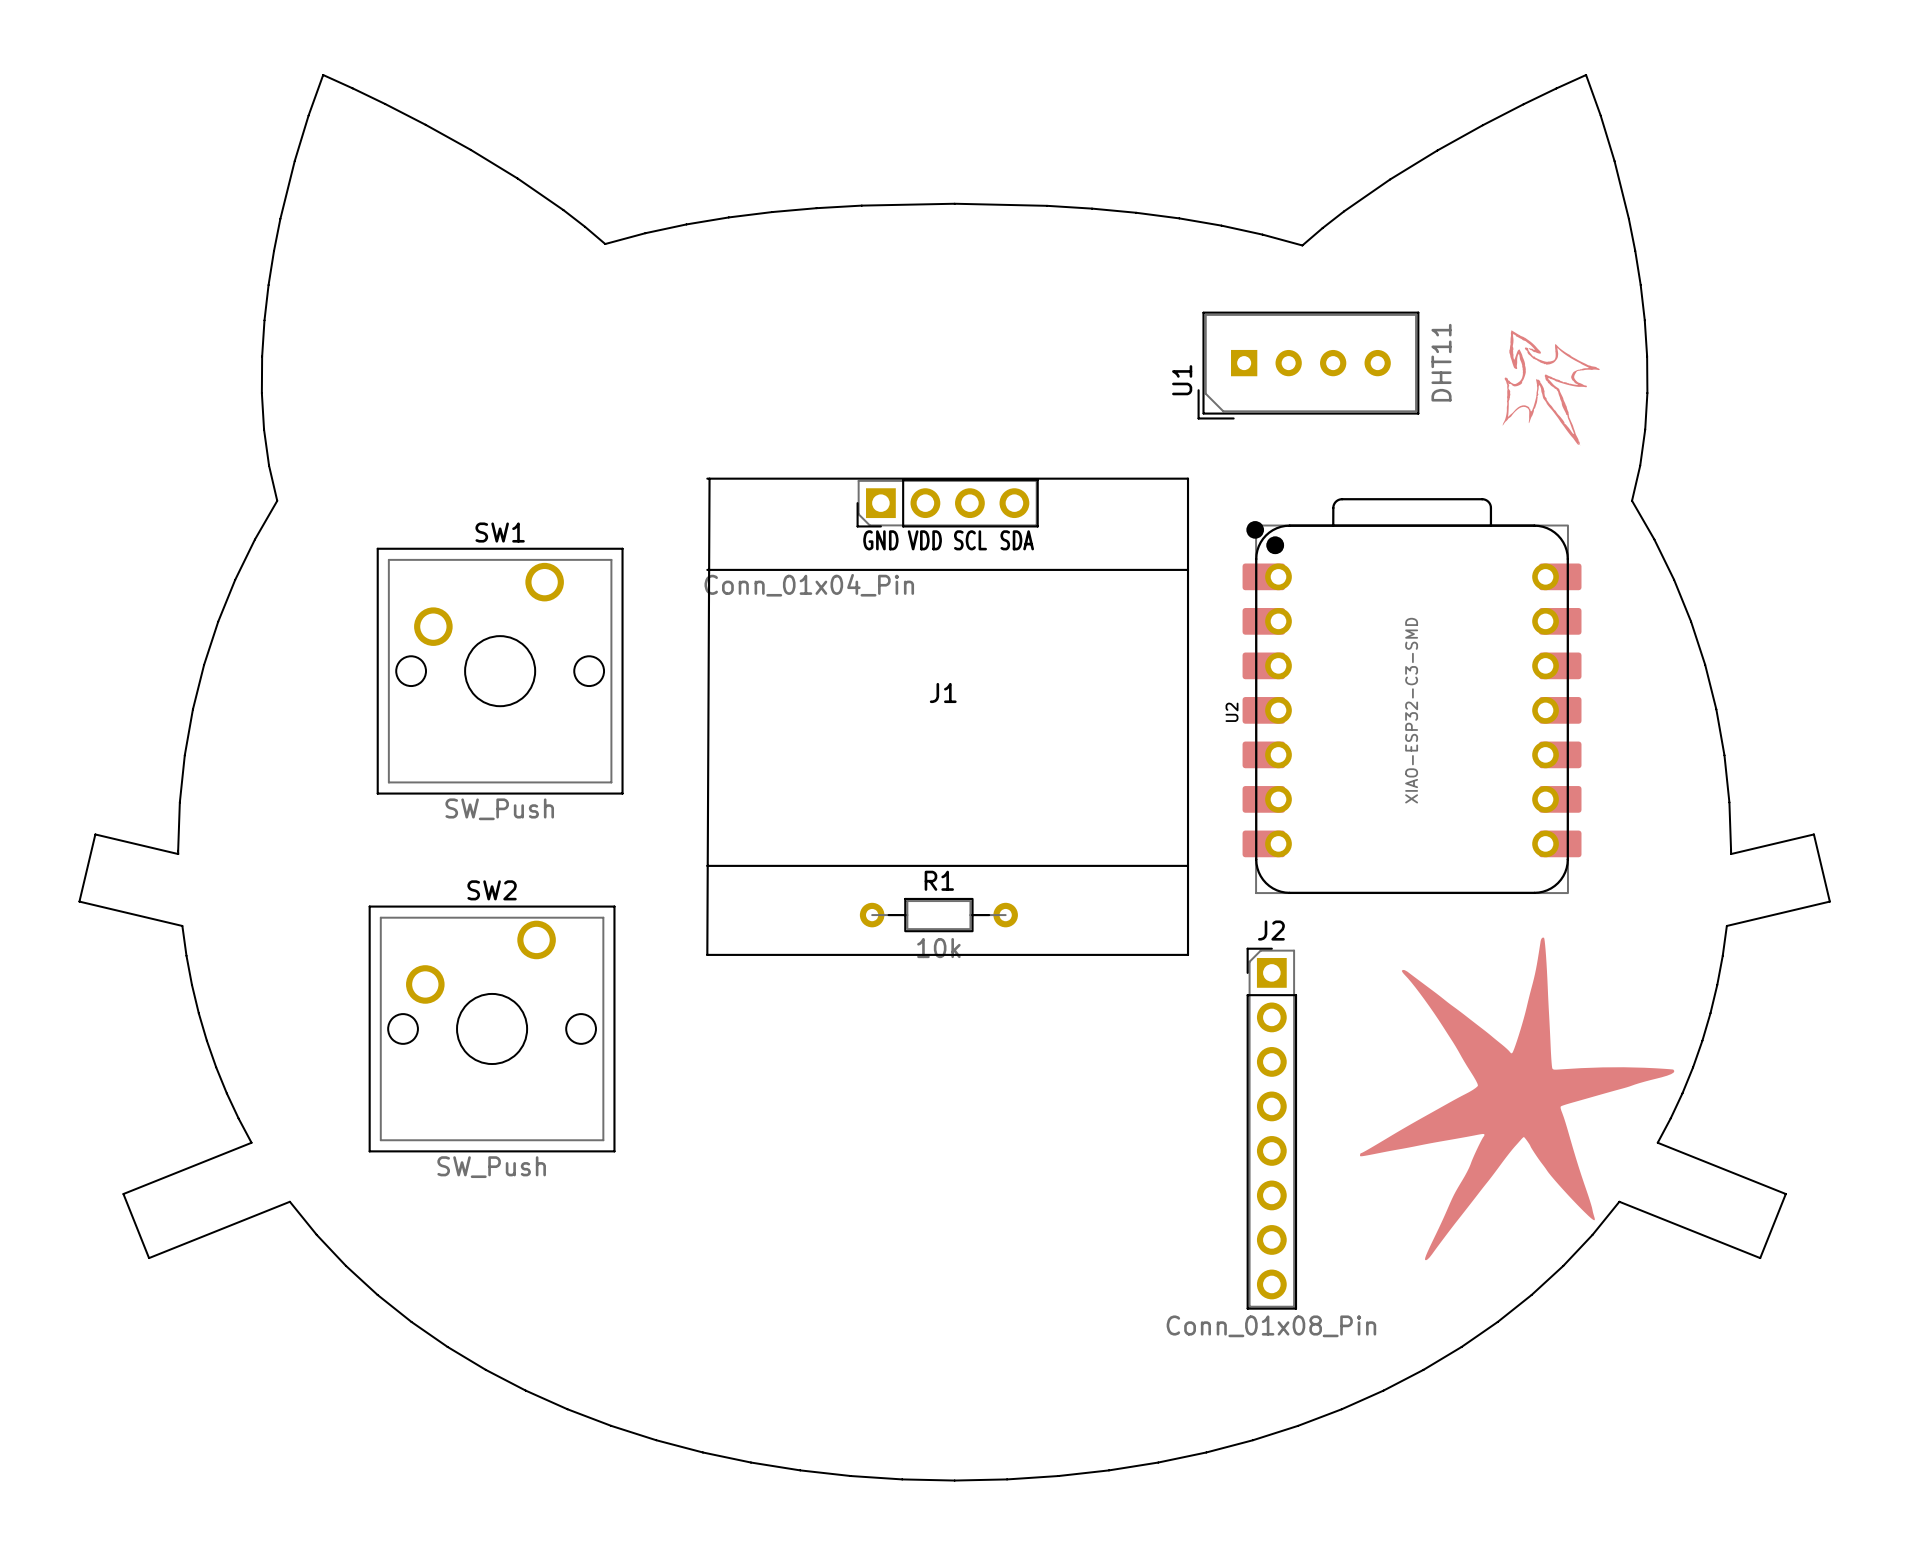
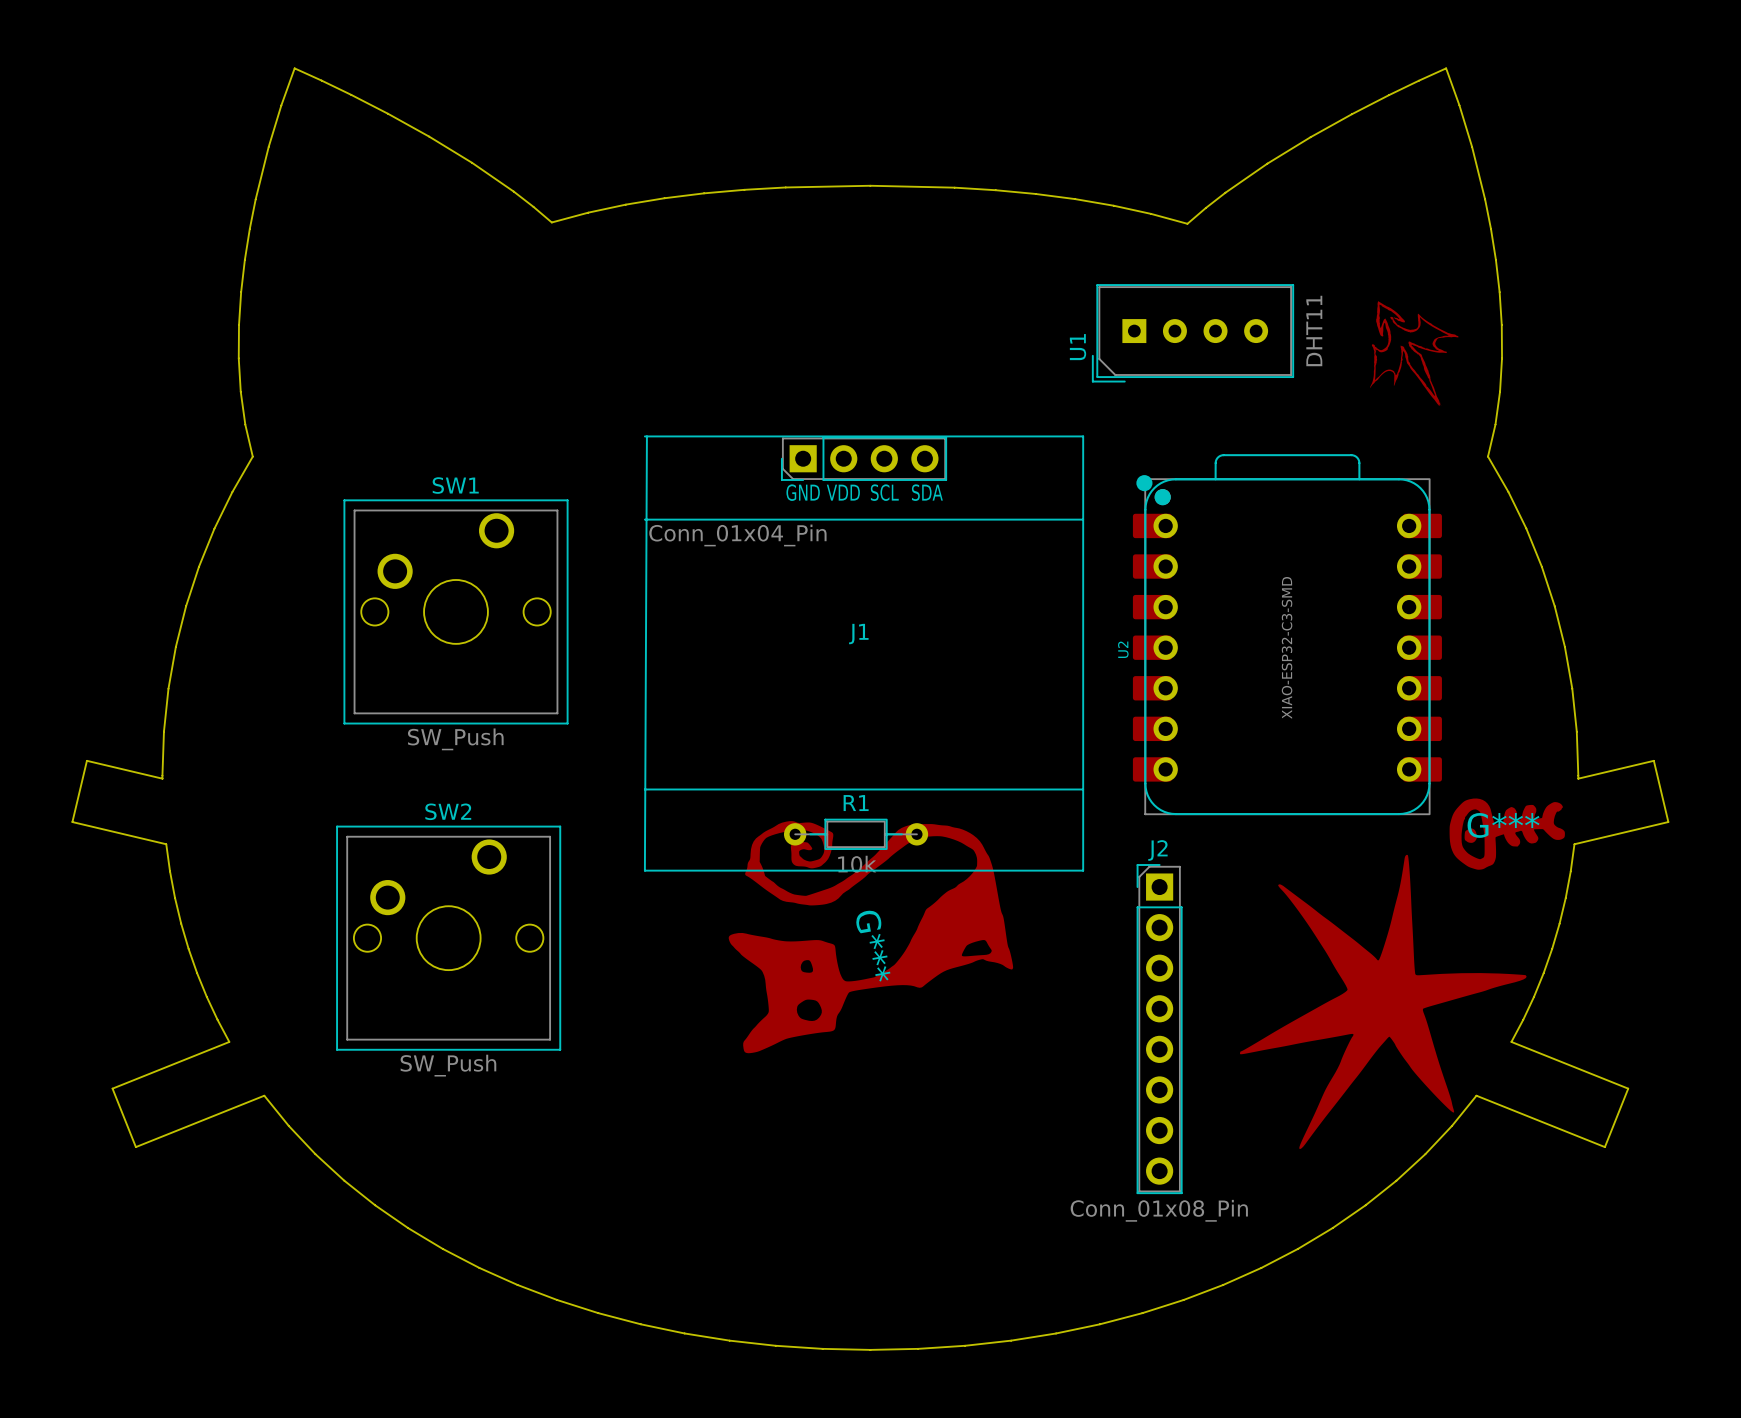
G***: none -> (1507, 834)
G***: none -> (870, 937)

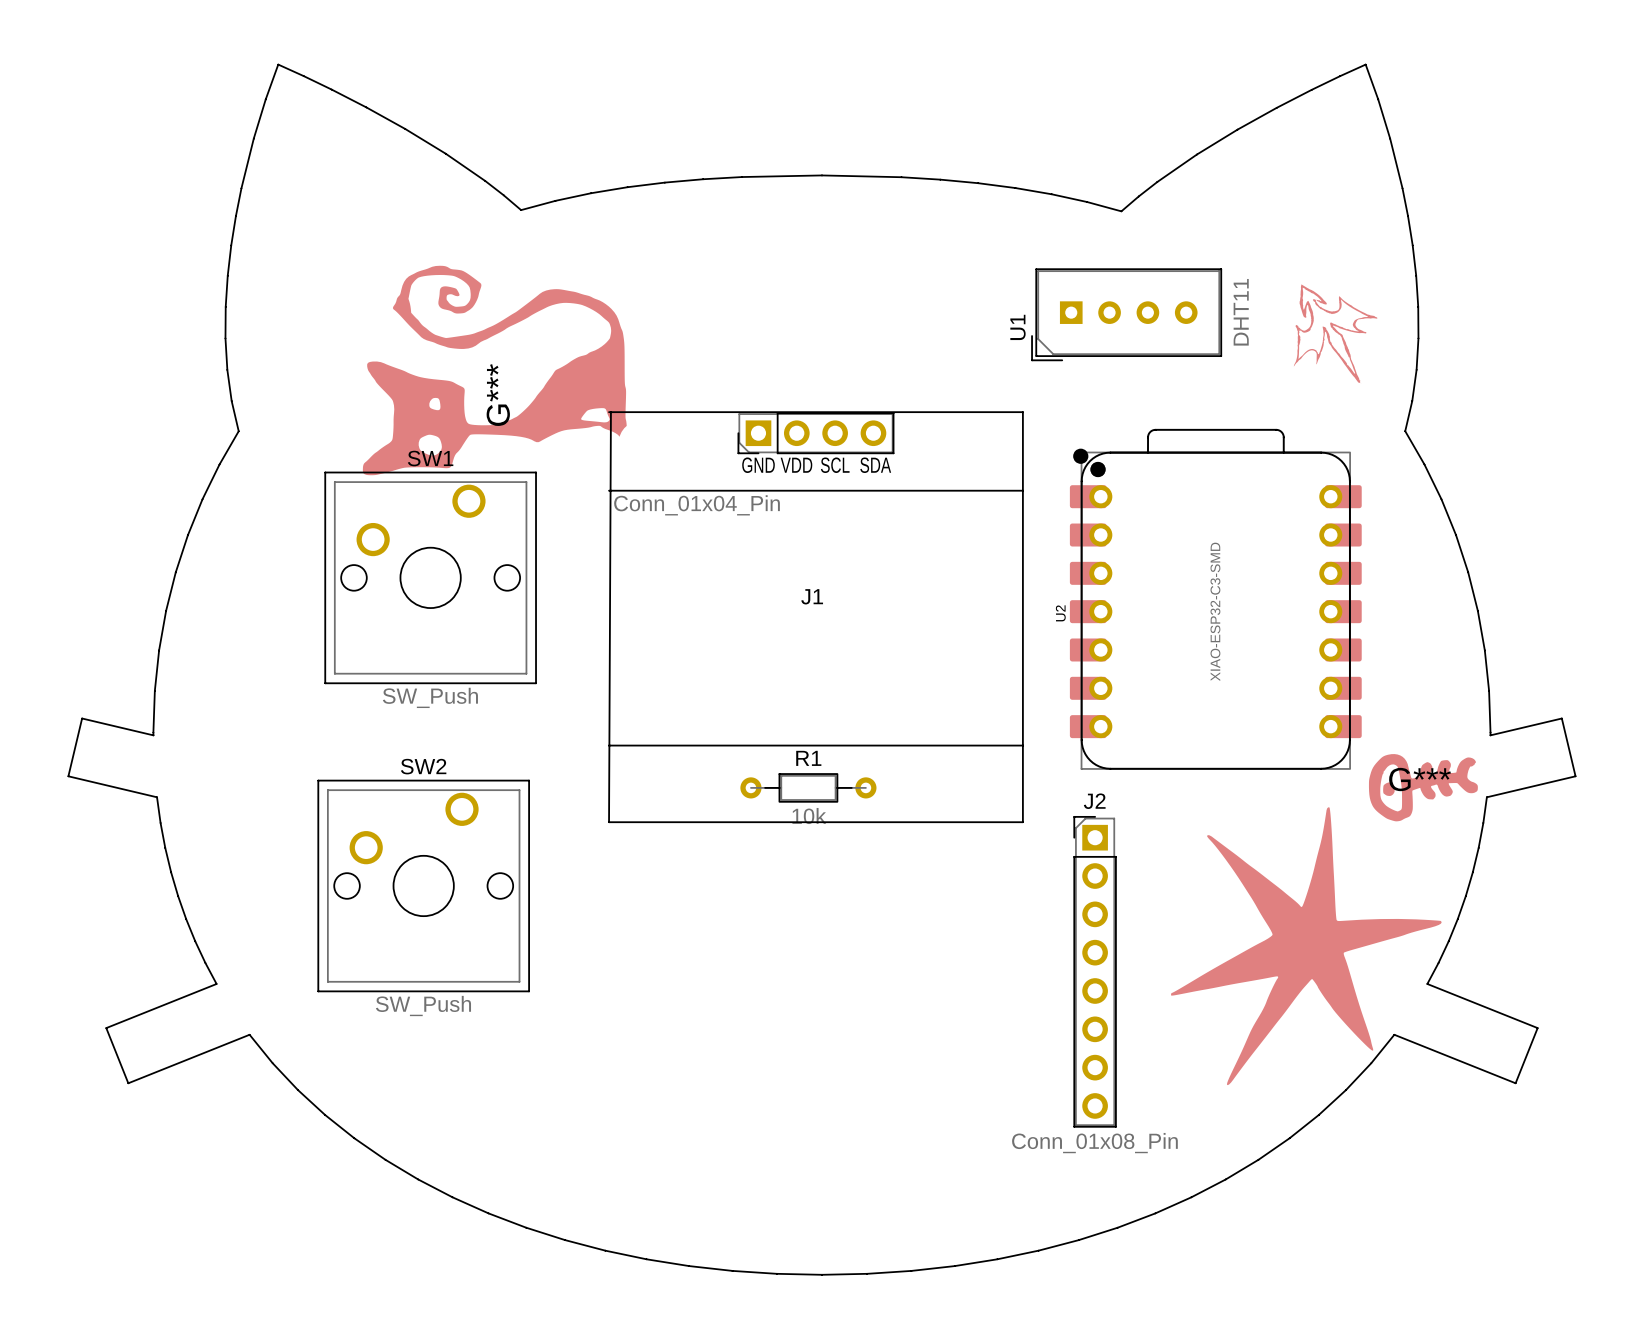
G***: none -> (494, 370)
G***: (870, 937) -> none

